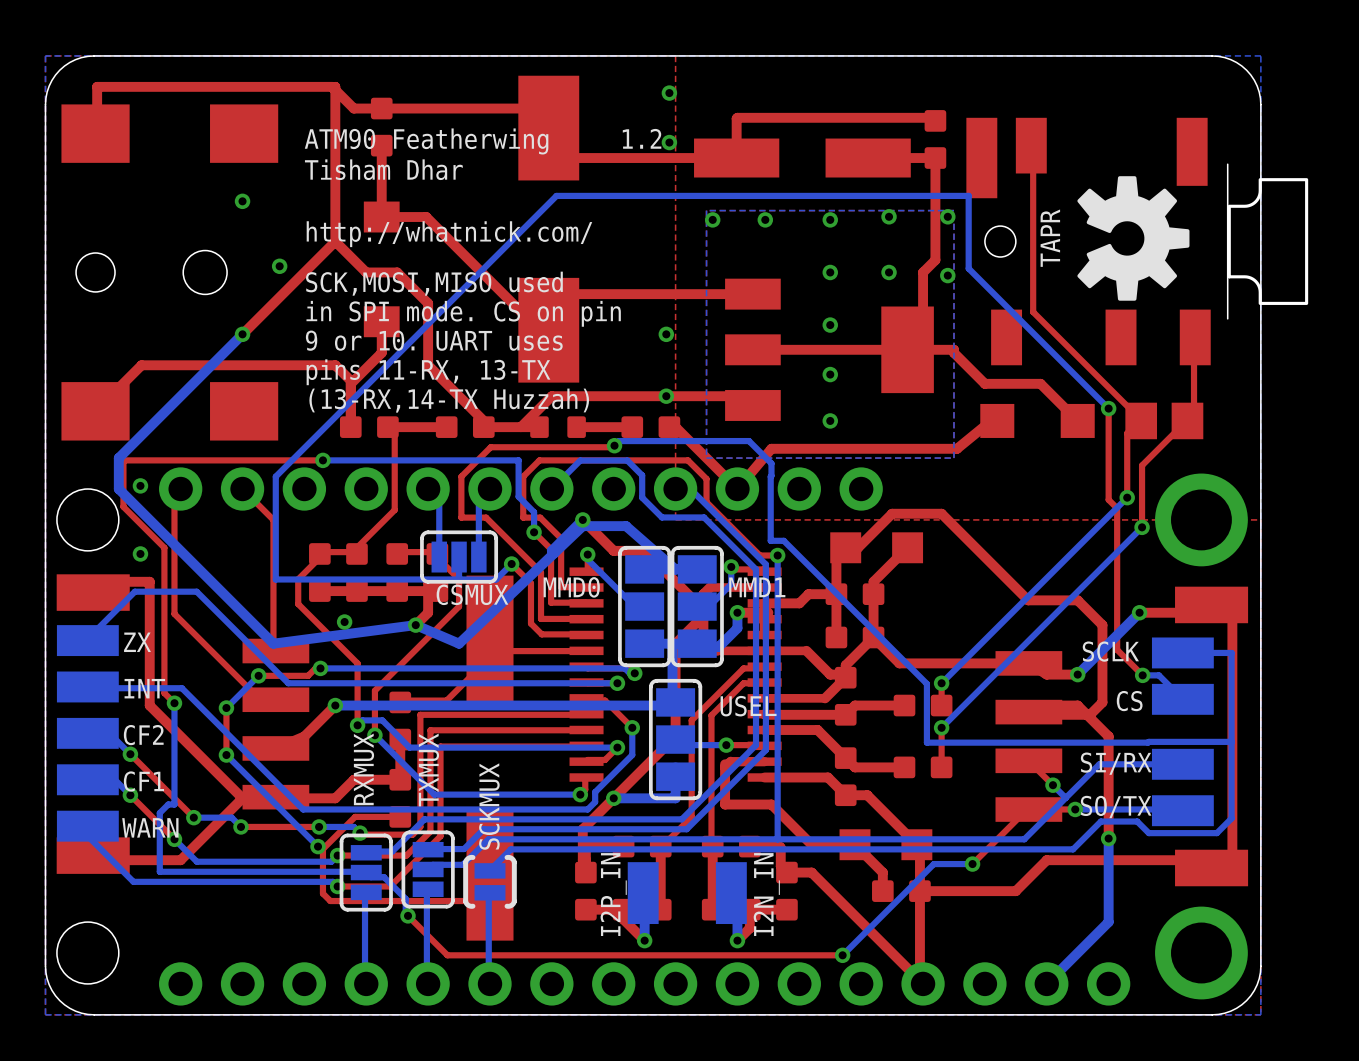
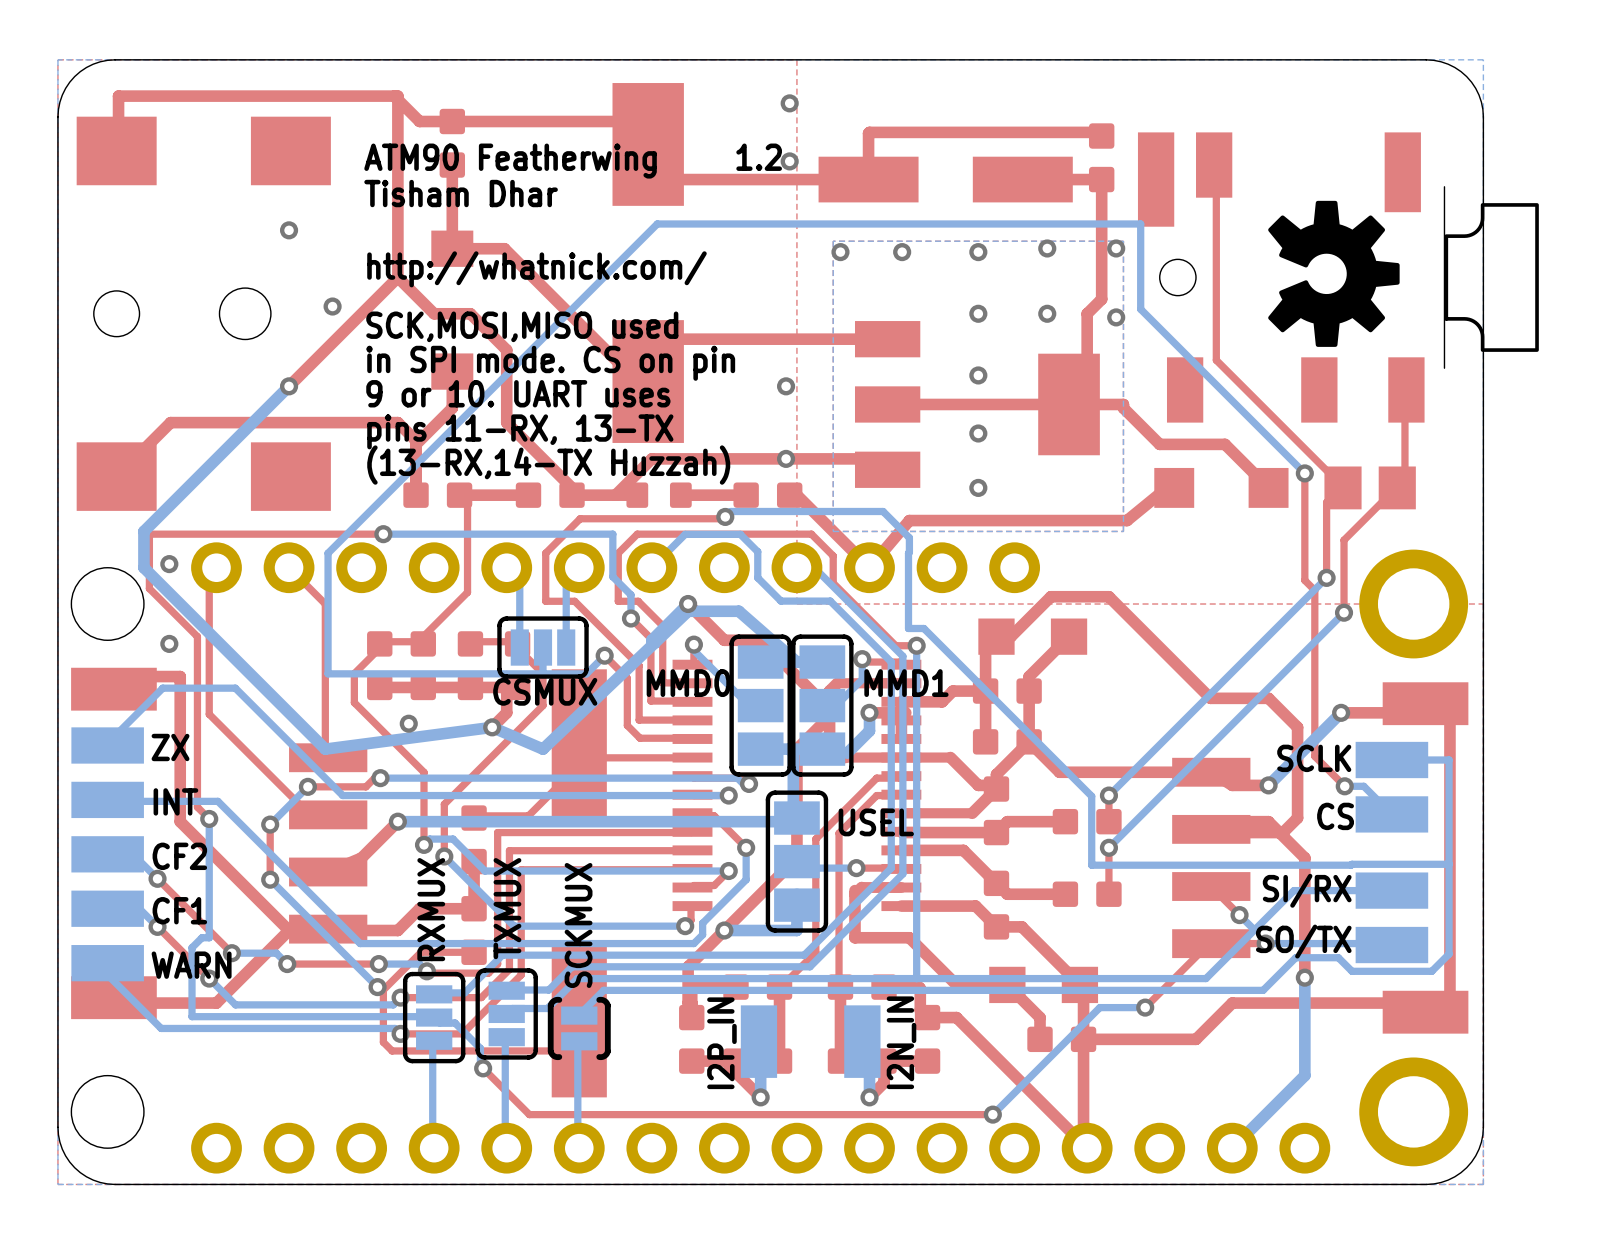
text: TAPR (1050, 238) -> none

